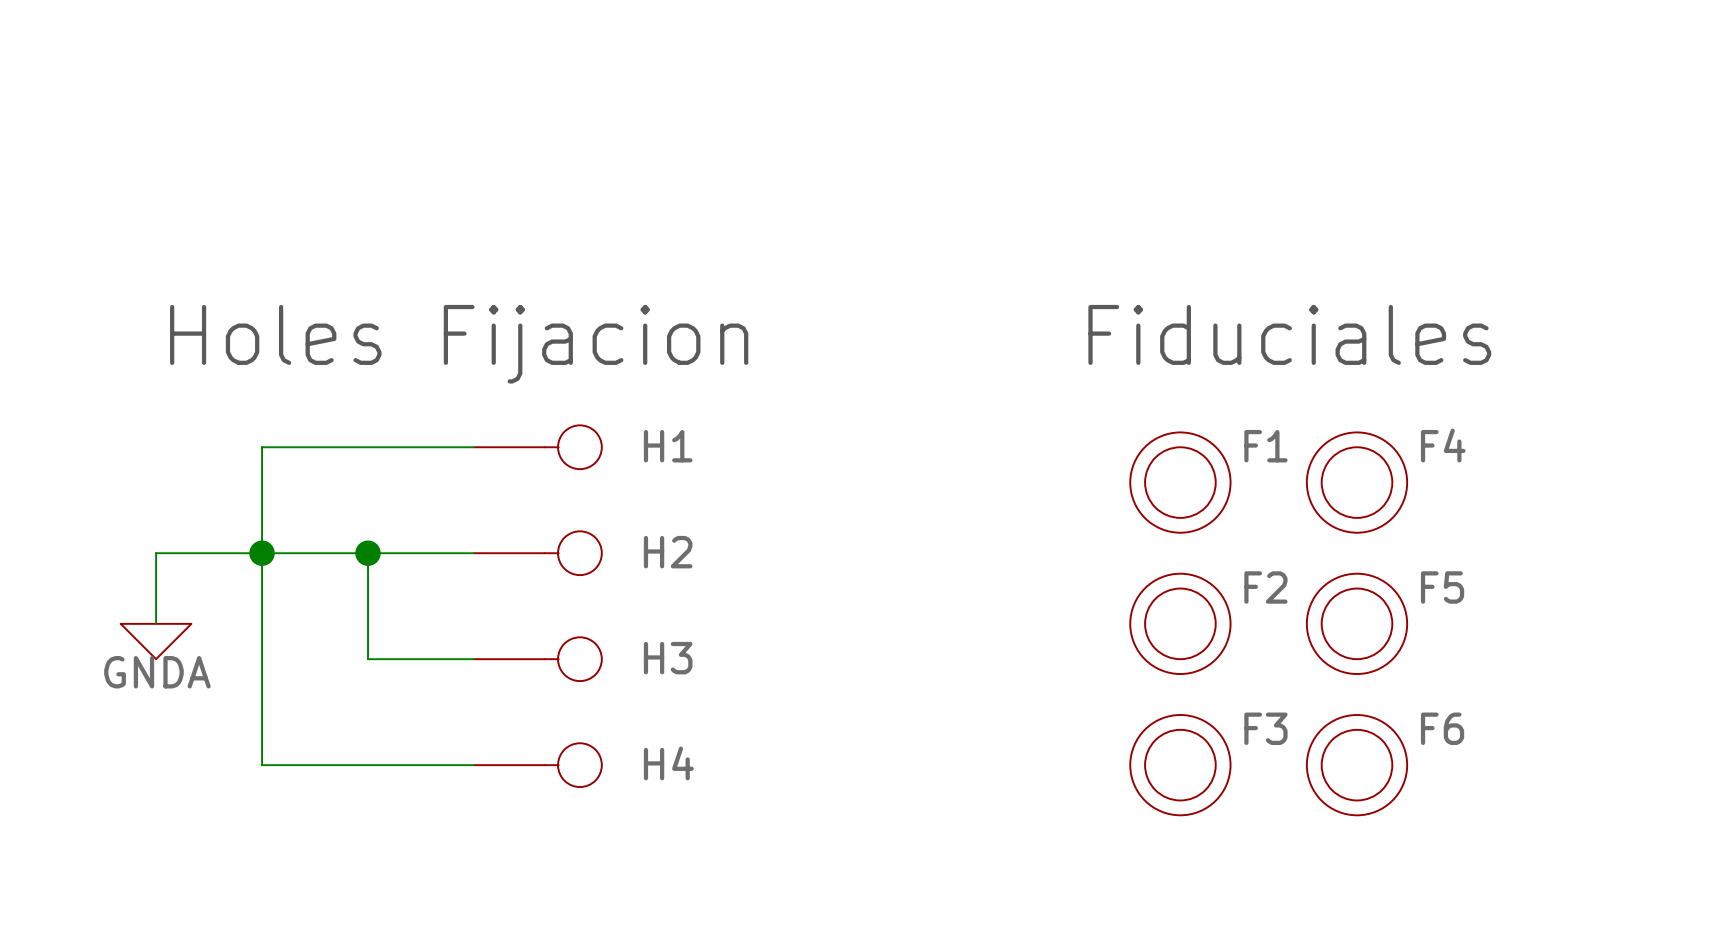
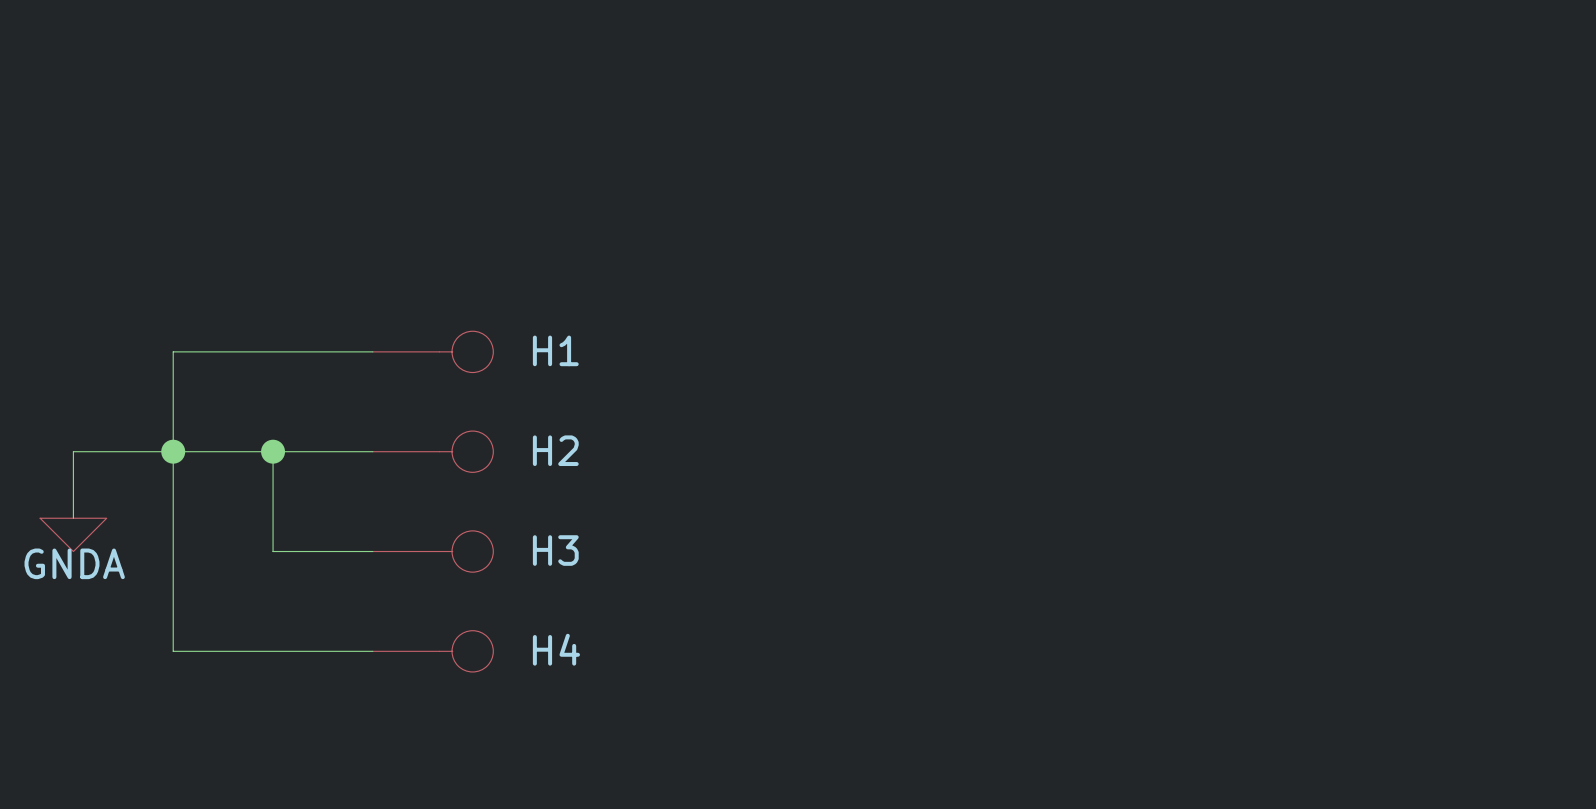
text: Fiduciales (1289, 334) -> none
text: Holes Fijacion (459, 344) -> none
F1: (1180, 482) -> none
F4: (1357, 482) -> none
F2: (1180, 623) -> none
F5: (1357, 623) -> none
F3: (1180, 765) -> none
F6: (1357, 765) -> none

